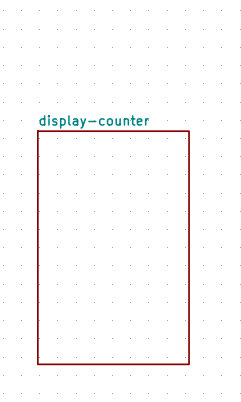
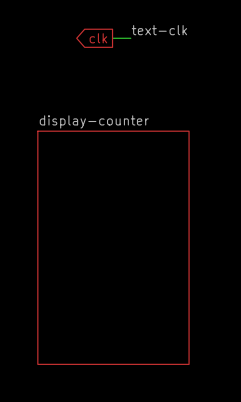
label: none -> text-clk (159, 30)
global label: none -> clk (98, 38)
wire: none -> (112, 38) (130, 38)

